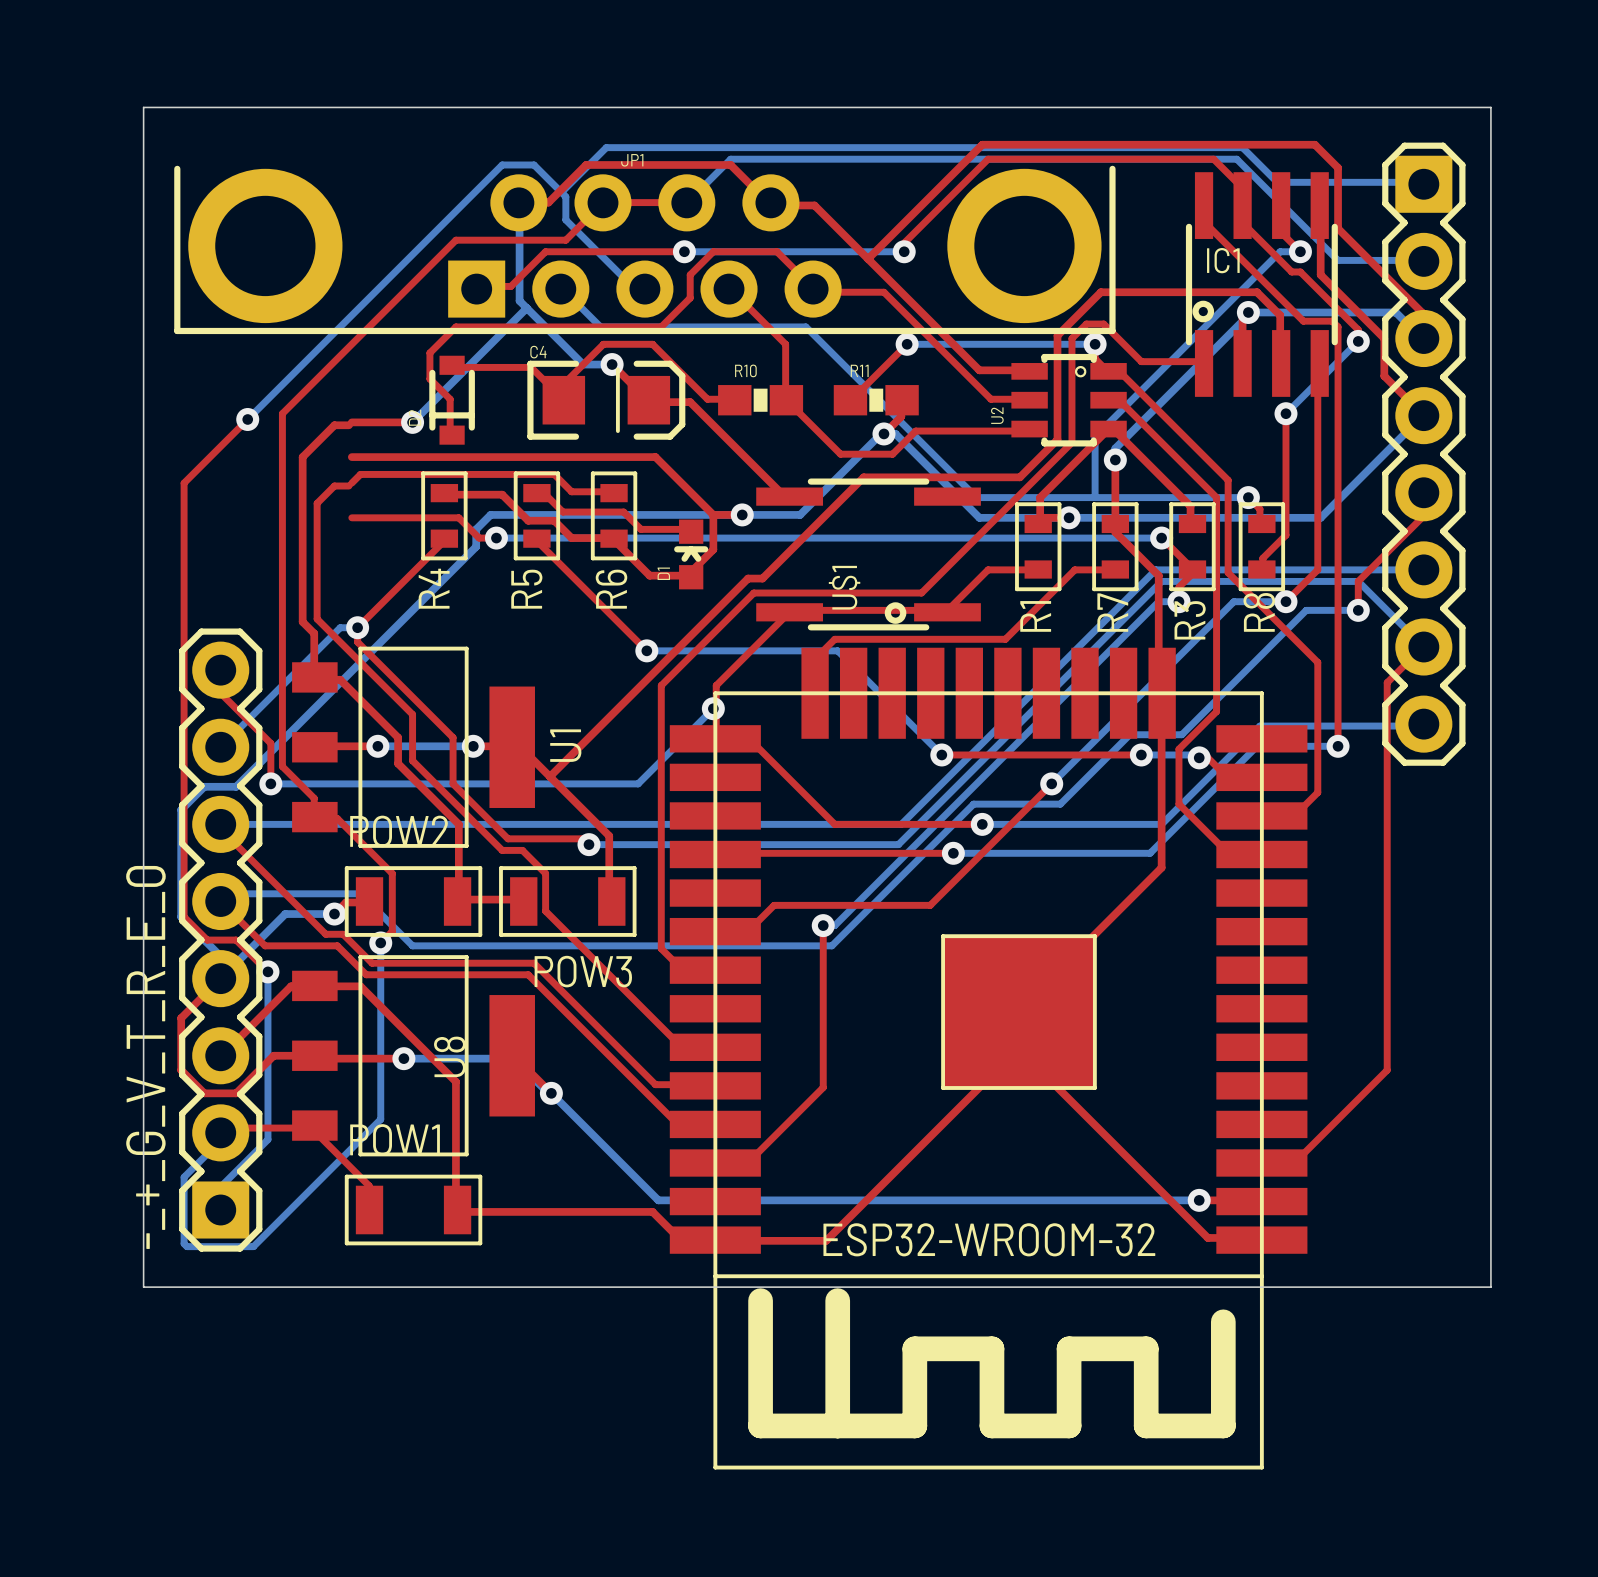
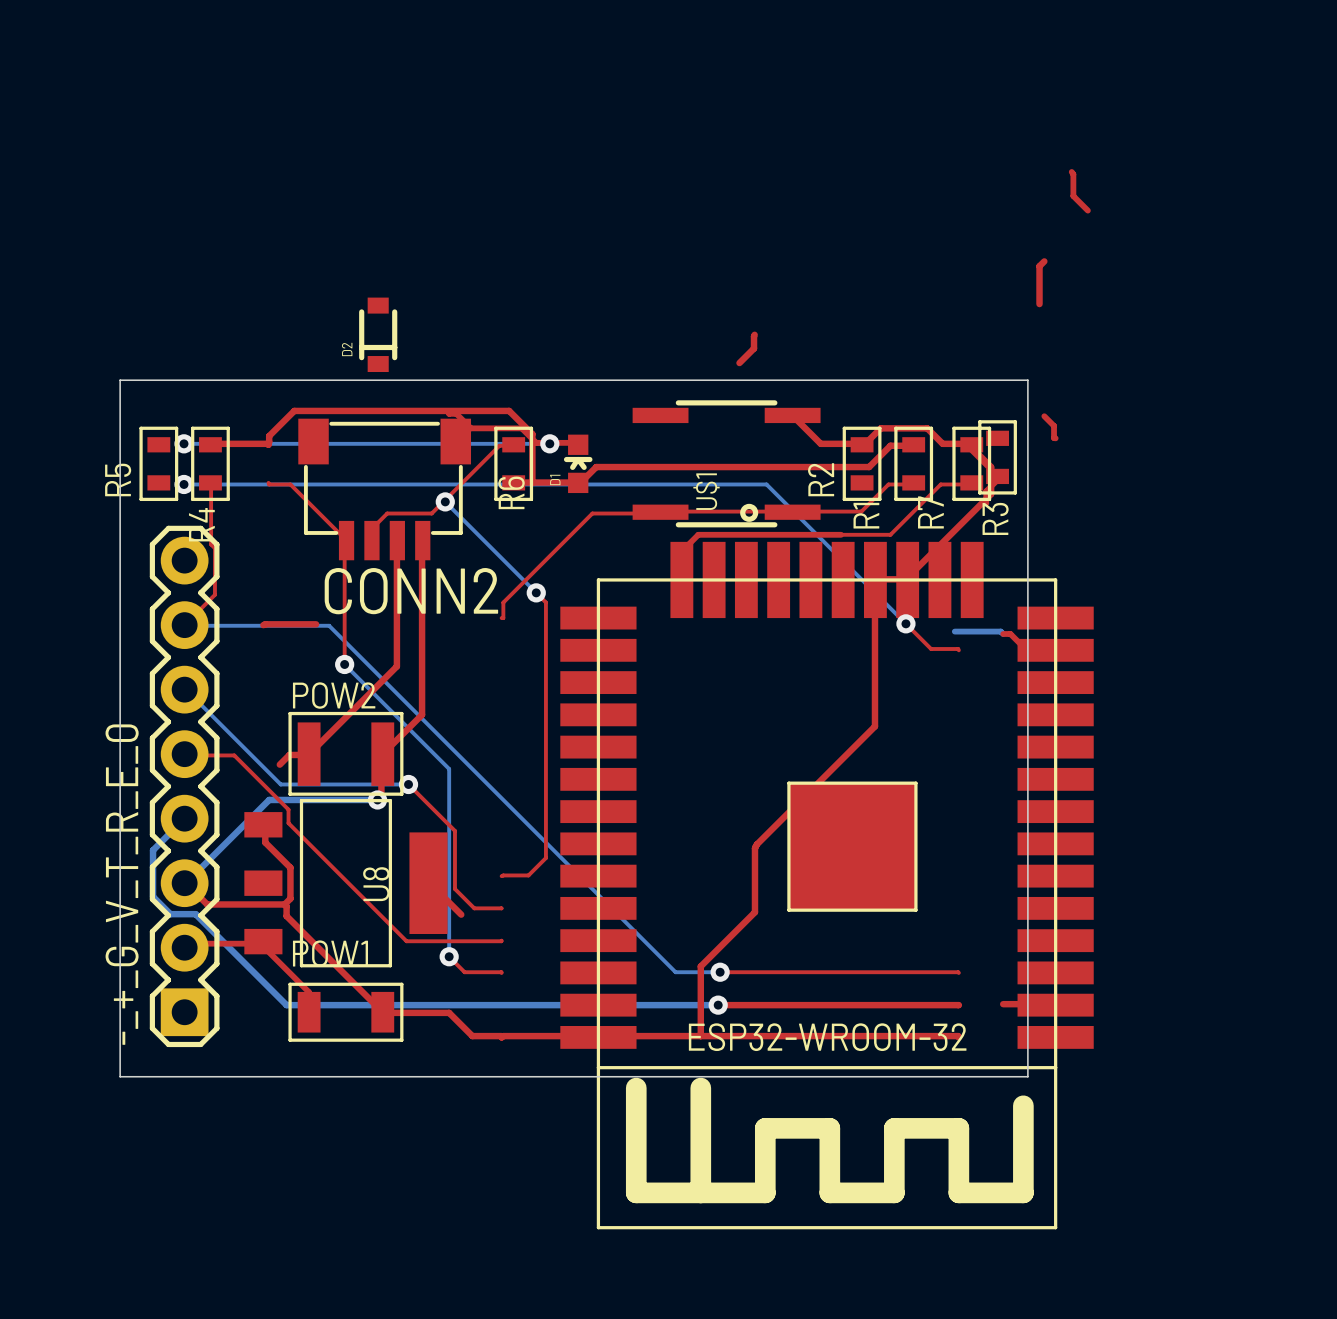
bottom track: (1423, 184) (1421, 182) (1277, 182) (1242, 147) (606, 147) (561, 192) -> none
top track: (518, 202) (548, 202) (586, 164) (730, 164) (768, 202) (770, 202) (771, 205) (814, 205) (979, 370) (1029, 371) -> none
bottom track: (518, 202) (519, 300) (583, 364) (612, 364) -> none
top track: (686, 202) (603, 202) (565, 240) (455, 240) (282, 413) (282, 766) (314, 798) (314, 817) (337, 818) (392, 873) (392, 931) (380, 942) -> none
bottom track: (687, 202) (730, 159) (1236, 159) (1338, 260) (1423, 261) -> none
top track: (1204, 205) (1205, 222) (1303, 321) (1332, 321) (1338, 326) (1338, 746) -> none
top track: (1319, 205) (1320, 274) (1384, 338) (1384, 376) (1423, 415) -> none
JP1: (644, 249) -> none
top track: (684, 251) (545, 251) (510, 286) (479, 286) (476, 289) -> none
bottom track: (684, 251) (904, 251) -> none
via: (684, 251) -> none
top track: (904, 251) (904, 243) (988, 159) (1213, 159) (1242, 188) (1242, 222) (1291, 271) (1300, 271) (1358, 329) (1358, 341) -> none
via: (904, 251) -> none
bottom track: (1300, 251) (1280, 251) (1095, 436) (1095, 497) -> none
via: (1300, 251) -> none
top track: (868, 258) (982, 144) (1314, 144) (1338, 167) (1338, 228) (1421, 312) (1421, 338) (1423, 338) -> none
IC1: (1261, 284) -> none
bottom track: (560, 289) (600, 326) (805, 326) (976, 497) (1248, 497) -> none
bottom track: (644, 289) (643, 286) (632, 286) (565, 219) (565, 196) (534, 164) (502, 164) (247, 419) -> none
top track: (729, 289) (785, 344) (785, 399) (840, 454) (892, 454) (915, 431) (1028, 431) (1029, 429) -> none
bottom track: (526, 308) (412, 422) -> none
via: (1248, 312) -> none
bottom track: (1423, 338) (1395, 312) (1248, 312) (1248, 315) (1115, 448) (1115, 459) -> none
bottom track: (1358, 341) (1285, 413) -> none
via: (1358, 341) -> none
top track: (907, 344) (850, 400) -> none
bottom track: (907, 344) (1095, 344) -> none
via: (907, 344) -> none
top track: (1095, 344) (1095, 358) (1109, 373) (1121, 373) (1228, 480) (1228, 572) (1317, 662) (1317, 792) (1294, 815) (1261, 815) -> none
via: (1095, 344) -> none
top track: (1204, 363) (1202, 361) (1141, 361) (1103, 324) (1086, 324) (1071, 338) (1071, 442) (921, 593) (753, 593) (661, 685) (661, 948) (681, 968) (715, 970) -> none
top track: (1281, 363) (1280, 315) (1257, 292) (1100, 292) (1057, 335) (1057, 439) (1019, 477) (863, 477) (762, 578) (748, 578) (549, 776) -> none
top track: (1319, 363) (1317, 364) (1317, 569) (1285, 601) -> none
top track: (612, 364) (649, 402) (690, 402) (782, 494) (788, 494) (789, 496) -> none
via: (612, 364) -> none
top track: (452, 365) (453, 367) (531, 367) (563, 400) (557, 390) (603, 344) (652, 344) (707, 399) (734, 400) -> none
C4: (606, 400) -> none
R10: (760, 400) -> none
R11: (876, 400) -> none
top track: (1029, 400) (990, 399) (883, 292) (814, 292) (811, 286) (776, 251) (713, 251) (690, 274) (690, 298) (661, 326) (455, 326) (429, 352) (429, 379) (450, 399) (450, 433) (452, 435) -> none
U2: (1069, 400) -> none
top track: (1108, 400) (1109, 402) (1121, 402) (1216, 497) (1216, 711) (1178, 749) (1178, 804) (1228, 853) (1261, 854) -> none
top track: (1285, 413) (1285, 535) (1262, 558) (1261, 569) -> none
via: (1285, 413) -> none
bottom track: (1423, 415) (1320, 517) (979, 517) (895, 433) (881, 433) (800, 514) (490, 514) (476, 529) (476, 546) (236, 786) (204, 786) (181, 809) (181, 916) (230, 966) (220, 978) (285, 914) (334, 914) -> none
top track: (247, 419) (184, 483) (184, 916) (207, 940) (236, 940) (267, 971) -> none
via: (247, 419) -> none
top track: (351, 422) (412, 422) -> none
via: (412, 422) -> none
top track: (348, 425) (334, 425) (302, 457) (302, 621) (314, 633) (314, 676) (317, 679) (340, 679) (398, 737) (398, 763) (458, 824) (457, 901) (458, 899) (522, 899) (523, 901) -> none
via: (883, 433) -> none
board edge: (143, 454) (143, 107) (1490, 107) (1490, 1287) (1228, 1287) -> (120, 380) (1027, 380) (1027, 1076)
part: (1423, 454) -> none
top track: (351, 457) (655, 457) (713, 514) -> none
top track: (1115, 459) (1115, 532) (1158, 575) (1158, 688) (1162, 693) (1161, 867) (1018, 1012) -> none
via: (1115, 459) -> none
top track: (351, 483) (360, 474) (554, 474) (571, 491) (614, 493) -> none
top track: (348, 486) (334, 486) (317, 503) (317, 619) (412, 714) (412, 760) (502, 850) (522, 850) (545, 873) (545, 911) (681, 1047) (715, 1047) -> none
top track: (1423, 492) (1421, 494) (1421, 517) (1358, 581) (1358, 610) -> none
top track: (444, 493) (444, 494) (502, 494) (528, 520) (554, 520) (571, 538) (614, 538) (649, 575) (690, 575) (691, 577) (690, 572) (713, 549) (713, 514) -> none
top track: none -> (792, 415) (820, 443) (862, 444) (880, 428) (927, 428) (942, 443) (971, 443) (971, 447) (991, 467) (991, 494) (905, 579) (875, 579) (874, 726) (755, 846) (754, 912) (700, 966) (700, 1036)
via: (1248, 497) -> none
top track: (713, 514) (742, 514) -> none
via: (742, 514) -> none
R4 position: (444, 515) -> (210, 463)
R5 position: (536, 515) -> (158, 463)
R6 position: (614, 515) -> (513, 463)
top track: (351, 517) (458, 517) (479, 538) (496, 538) -> none
top track: (1069, 517) (1043, 517) (1038, 523) (1040, 523) (1040, 497) (1106, 431) (1109, 425) (1190, 506) (1190, 523) (1192, 523) -> none
via: (1069, 517) -> none
bottom track: none -> (184, 443) (549, 443)
via: none -> (184, 443)
via: none -> (549, 443)
top track: none -> (210, 444) (268, 444) (269, 436) (294, 410) (509, 410) (532, 434) (532, 482)
top track: none -> (513, 444) (499, 445) (431, 513) (387, 513) (373, 527) (371, 540)
top track: none -> (913, 444) (890, 445) (869, 467) (596, 467) (580, 482) (513, 482)
top track: (444, 538) (444, 540) (357, 627) (357, 642) (453, 737) (453, 783) (508, 838) (583, 838) (588, 844) -> none
bottom track: (496, 538) (1161, 538) -> none
via: (496, 538) -> none
top track: (536, 538) (536, 540) (646, 650) -> none
via: (1161, 538) -> none
R1 position: (1038, 546) -> (913, 463)
R7 position: (1115, 546) -> (971, 463)
R8: (1261, 546) -> none
R2: none -> (862, 463)
top track: (1038, 569) (988, 569) (947, 612) (944, 610) (791, 610) (716, 685) (715, 738) (748, 737) (834, 824) (982, 824) -> none
top track: (1115, 569) (1074, 569) (1005, 639) -> (971, 482) (971, 484) (940, 484) (890, 534) (841, 534)
bottom track: (1423, 569) (1155, 569) (901, 824) (222, 824) -> none
top track: none -> (210, 482) (211, 544) (214, 548) (214, 594) (184, 625)
top track: none -> (268, 482) (269, 484) (290, 484) (346, 540) (344, 540) (344, 664)
top track: none -> (913, 482) (913, 484) (888, 484) (861, 511) (592, 513) (503, 602) (503, 618) (501, 618)
bottom track: none -> (184, 484) (766, 484) (905, 623)
via: none -> (184, 484)
CONN2: none -> (384, 489)
R5 name position: R5 (526, 589) -> R5 (118, 479)
bottom track: none -> (445, 501) (536, 592)
via: none -> (445, 501)
bottom track: (1178, 601) (1158, 601) (834, 925) (823, 925) -> none
via: (1178, 601) -> none
bottom track: (1285, 601) (1233, 601) (1051, 783) -> none
via: (1285, 601) -> none
bottom track: (1358, 610) (1306, 610) (1181, 734) (1129, 734) (1060, 804) (973, 804) (831, 945) (412, 945) (360, 893) (227, 893) (220, 901) -> none
via: (1358, 610) -> none
bottom track: (357, 627) (340, 627) (220, 747) -> (720, 972) (675, 972) (329, 625) (184, 625)
via: (357, 627) -> none
top track: none -> (396, 540) (396, 666) (309, 754)
top track: none -> (422, 540) (422, 714) (381, 755) (381, 796) (377, 799)
top track: (1423, 647) (1387, 682) (1387, 1070) (1294, 1162) (1261, 1163) -> none
bottom track: (1423, 647) (1358, 581) (1161, 581) (898, 844) (588, 844) -> none
bottom track: (646, 650) (837, 650) (941, 754) -> none
via: (646, 650) -> none
top track: (220, 670) (221, 694) (270, 743) (270, 783) -> none
top track: none -> (536, 592) (545, 602) (545, 858) (528, 875) (501, 876)
via: none -> (536, 592)
bottom track: (713, 708) (638, 783) (270, 783) -> none
via: (713, 708) -> none
bottom track: (1423, 724) (1421, 726) (1259, 726) (1161, 824) (982, 824) -> none
top track: none -> (905, 623) (931, 649) (958, 650)
via: none -> (905, 623)
bottom track: (377, 746) (473, 746) -> none
via: (377, 746) -> none
top track: (473, 746) (510, 746) (513, 749) (522, 749) (609, 835) (609, 899) (611, 901) -> none
via: (473, 746) -> none
bottom track: (1338, 746) (1257, 746) (1150, 853) (953, 853) -> none
via: (1338, 746) -> none
U1: (413, 747) -> none
top track: (941, 754) (1141, 754) -> none
via: (941, 754) -> none
via: (1141, 754) -> none
via: (1199, 757) -> none
via: (270, 783) -> none
top track: (1051, 783) (930, 905) (774, 905) (748, 931) (715, 931) -> none
via: (1051, 783) -> none
bottom track: none -> (344, 664) (449, 769) (449, 956)
via: none -> (344, 664)
top track: (220, 824) (221, 830) (325, 934) (343, 934) (372, 963) (534, 963) (655, 1084) (715, 1085) -> none
bottom track: none -> (184, 689) (280, 784) (408, 784)
via: (982, 824) -> none
via: (588, 844) -> none
top track: (953, 853) (715, 854) -> none
via: (953, 853) -> none
POW2 footprint: [344, 866, 483, 937] -> [288, 711, 404, 796]
POW3: (567, 901) -> none
top track: (222, 903) (265, 945) (337, 945) (366, 974) (528, 974) (675, 1122) (713, 1122) (715, 1124) -> (185, 755) (234, 755) (288, 809) (288, 823) (406, 941) (501, 940)
via: (334, 914) -> none
top track: (823, 925) (823, 1087) (748, 1162) (715, 1163) -> none
via: (823, 925) -> none
top track: none -> (408, 784) (454, 830) (454, 889) (474, 908) (501, 908)
via: none -> (408, 784)
bottom track: (380, 942) (380, 1119) (253, 1246) (186, 1246) (184, 1243) (184, 1177) (218, 1142) (218, 1133) (220, 1132) -> none
via: (380, 942) -> none
bottom track: none -> (377, 799) (269, 799) (184, 883)
via: none -> (377, 799)
bottom track: (267, 971) (267, 1139) (221, 1185) (220, 1210) -> none
via: (267, 971) -> none
top track: (220, 978) (181, 1018) (181, 1070) (204, 1093) (236, 1093) (273, 1055) (298, 1055) -> none
bottom track: none -> (184, 818) (153, 850) (153, 896) (170, 914) (195, 914) (286, 1005) (718, 1005)
top track: (314, 985) (291, 986) (221, 1055) -> (284, 904) (207, 904) (185, 883)
top track: (317, 986) (360, 986) (455, 1081) (455, 1209) (458, 1211) (652, 1211) (678, 1237) (713, 1237) (719, 1240) (826, 1240) (1017, 1049) (1018, 1012) -> (265, 825) (265, 842) (290, 867) (290, 898) (284, 904)
top track: (1018, 1012) (1019, 1049) (1207, 1237) (1259, 1237) (1261, 1240) -> none
top track: (314, 1055) (317, 1058) (403, 1058) -> none
bottom track: (403, 1058) (513, 1058) (548, 1093) (551, 1093) (658, 1200) (1199, 1200) -> none
via: (403, 1058) -> none
top track: none -> (284, 904) (286, 906) (286, 916) (383, 1012) (449, 1012) (472, 1036) (958, 1037)
via position: (551, 1093) -> (449, 956)
top track: none -> (449, 956) (464, 972) (501, 972)
top track: none -> (720, 972) (958, 972)
via: none -> (720, 972)
via: (1199, 1200) -> none
top track: none -> (718, 1005) (958, 1005)
via: none -> (718, 1005)

